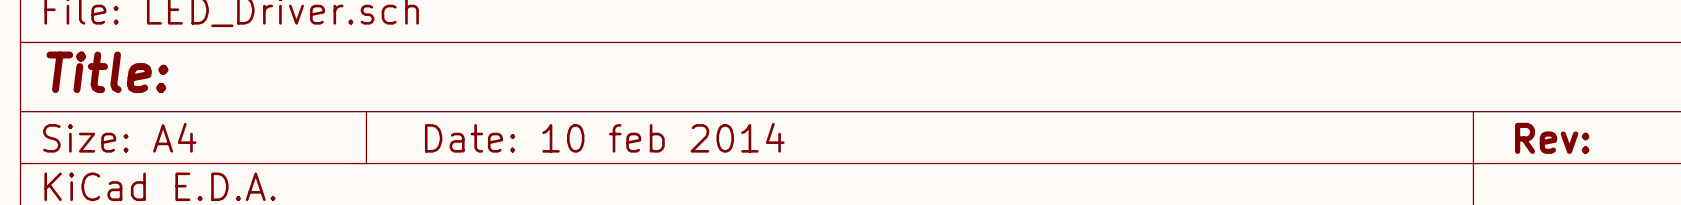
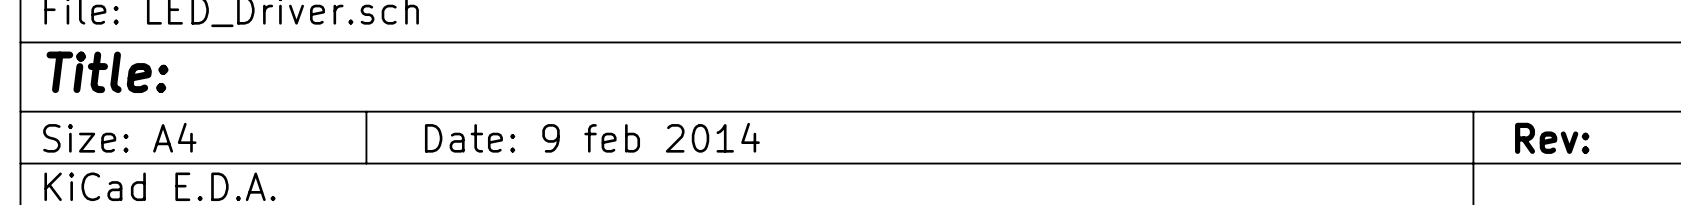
title block: Date: 10 feb 2014 (604, 137) -> Date: 9 feb 2014 (592, 137)

